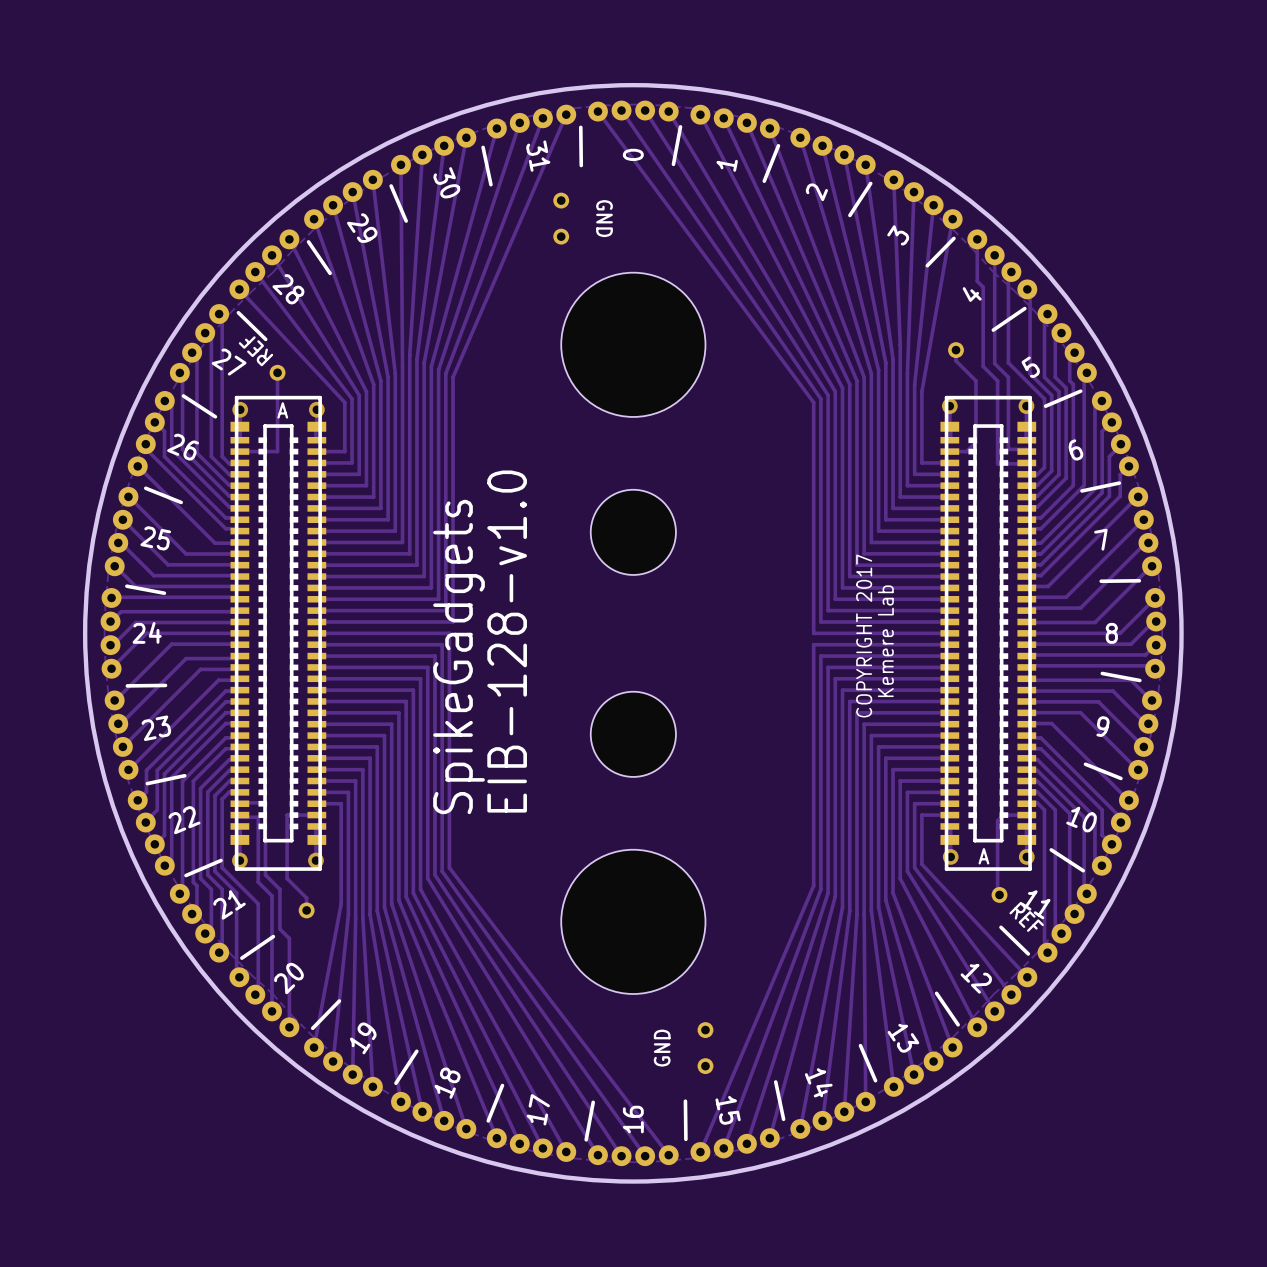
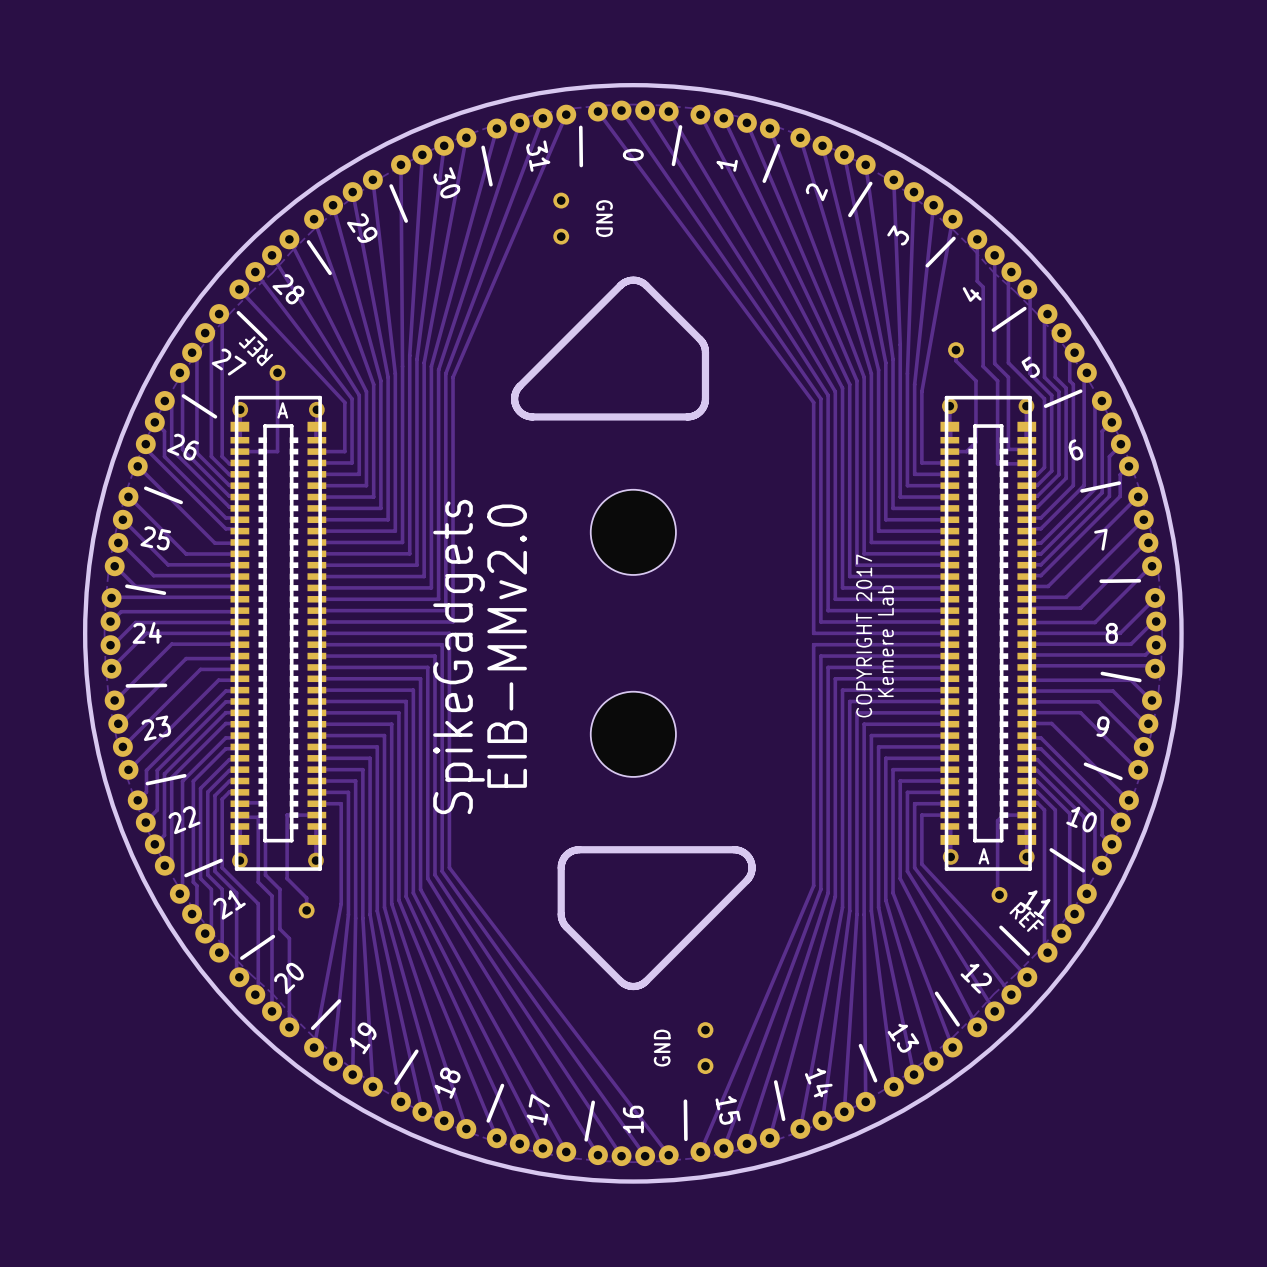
board edge: none -> (633, 280) (646, 285) (703, 343) (705, 352) (705, 398) (701, 409) (694, 415) (687, 416) (532, 416) (521, 413) (514, 401) (518, 387) (620, 285) (633, 280)
hole: (633, 344) -> none
text: EIB-128-v1.0 (507, 641) -> EIB-MMv2.0 (507, 646)
board edge: none -> (579, 849) (736, 849) (748, 856) (751, 870) (746, 880) (646, 981) (640, 985) (630, 986) (620, 981) (562, 921) (561, 863) (568, 853) (579, 849)
hole: (633, 921) -> none

